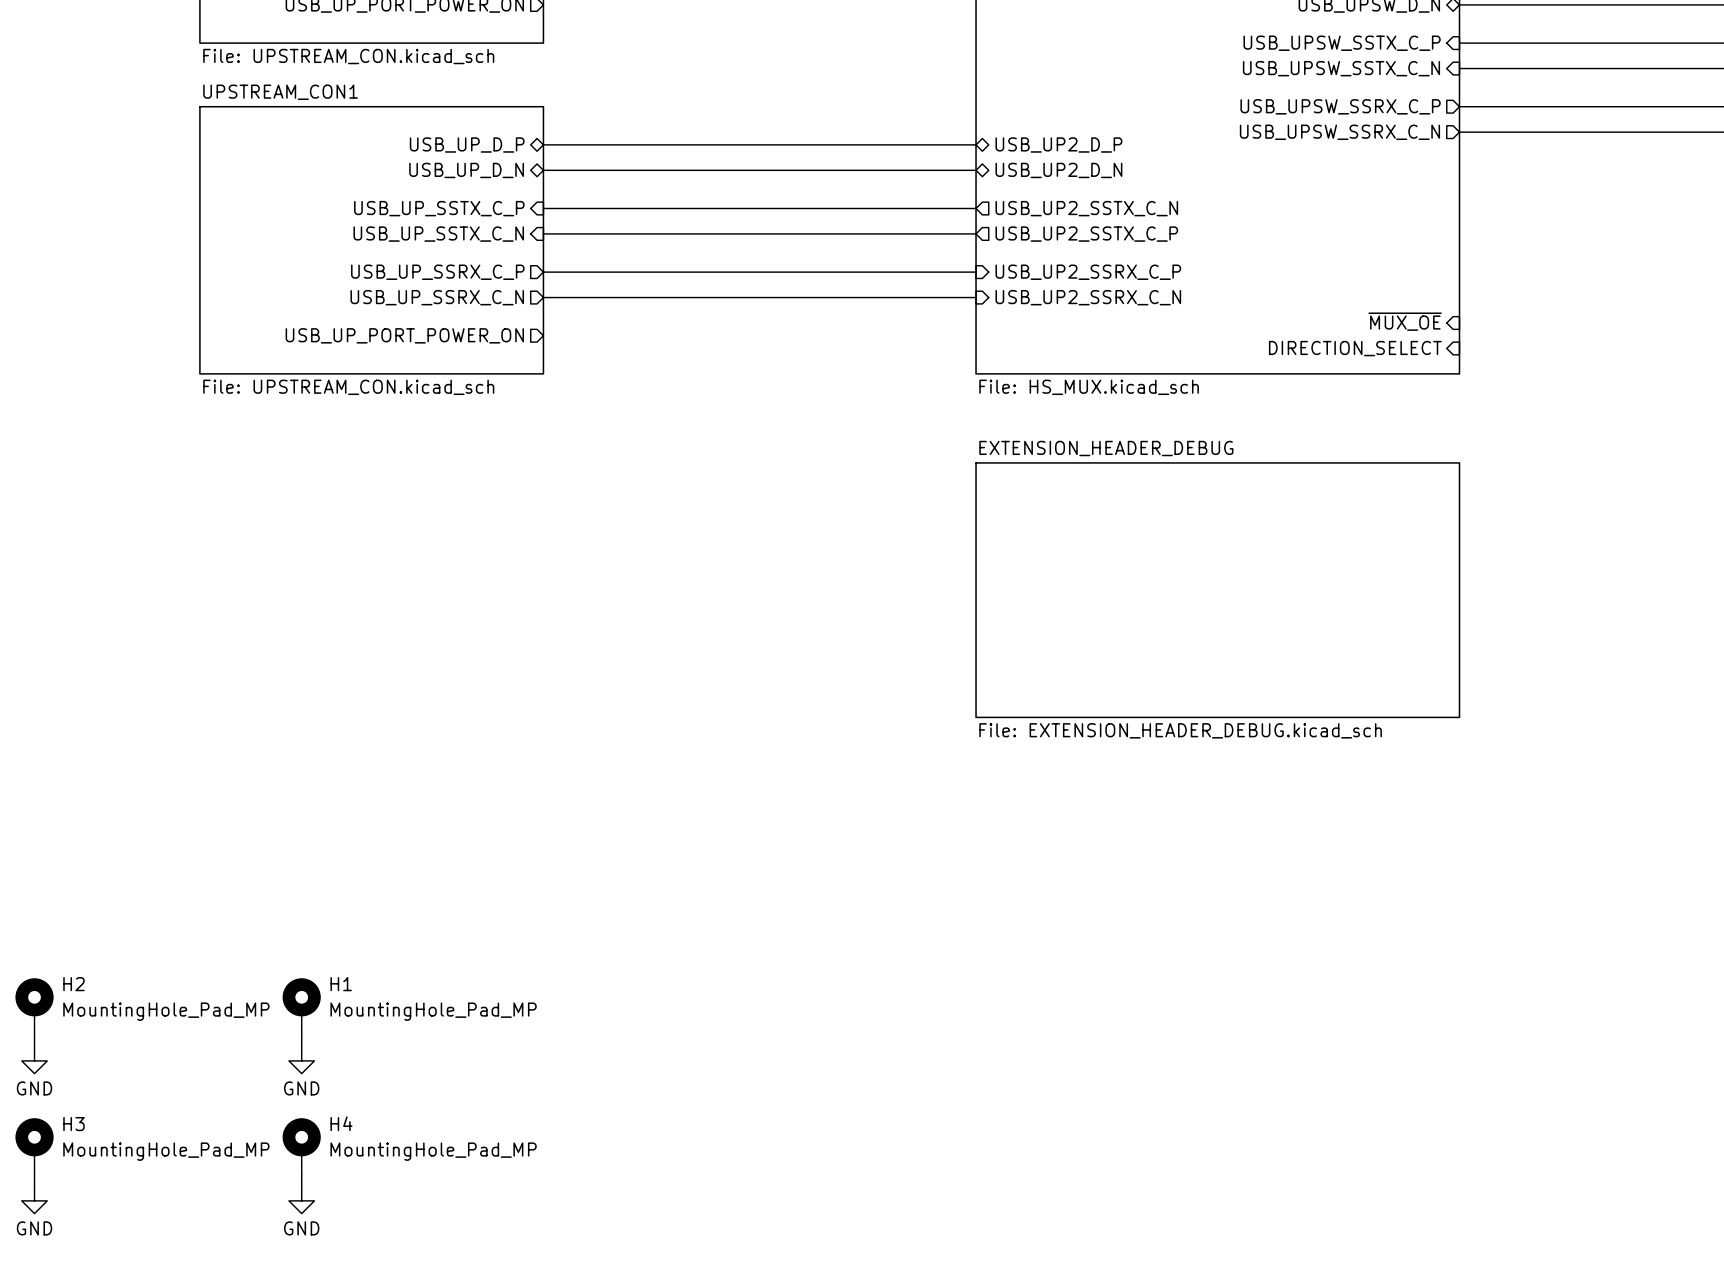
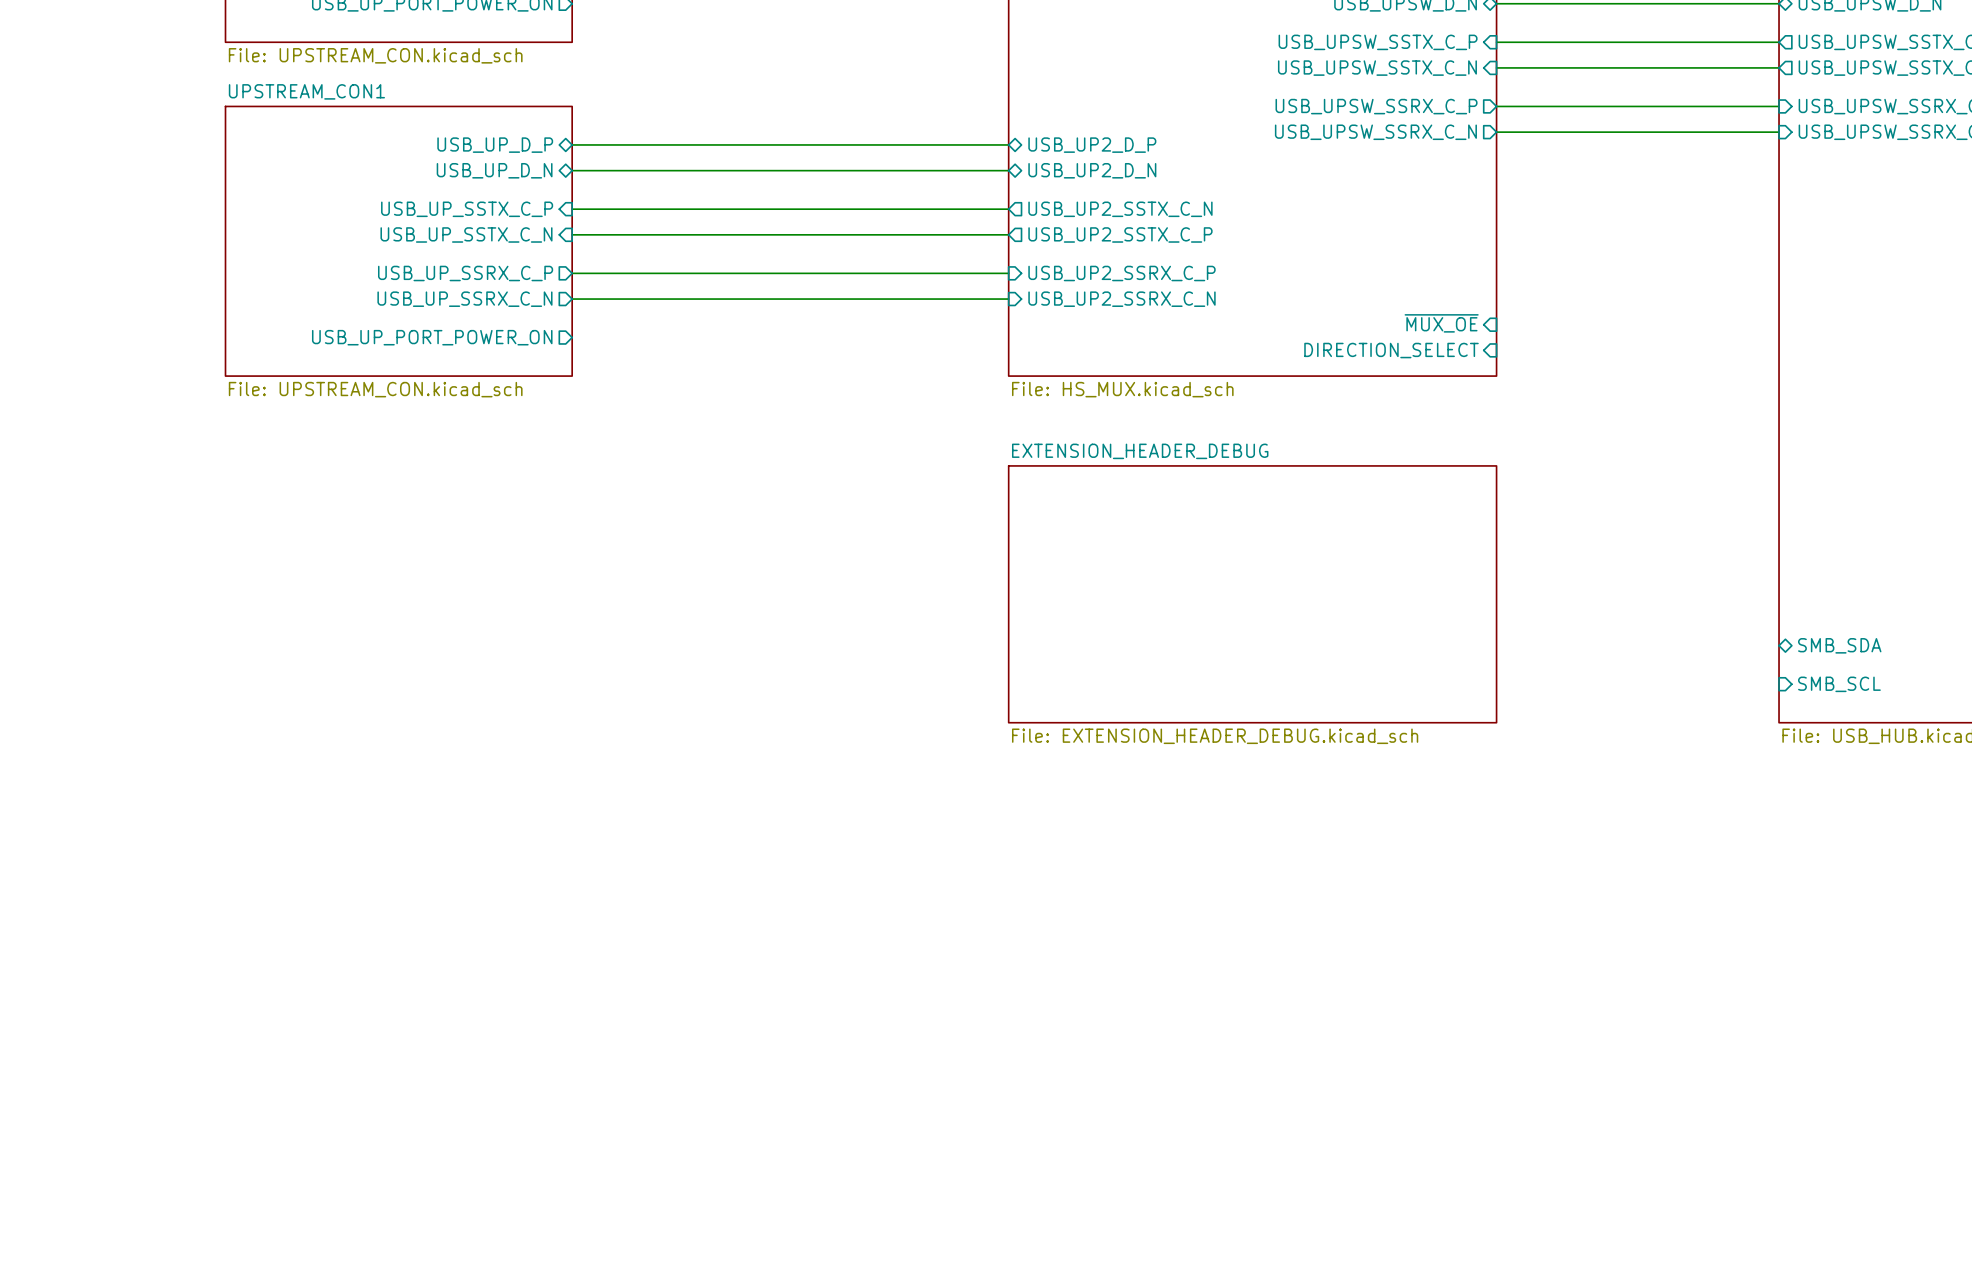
H2: MountingHole_Pad_MP (34, 1006) -> none
H1: MountingHole_Pad_MP (301, 1006) -> none
wire: (34, 1035) (34, 1048) -> none
wire: (301, 1035) (301, 1048) -> none
power symbol: GND (34, 1060) -> none
power symbol: GND (301, 1060) -> none
H3: MountingHole_Pad_MP (34, 1146) -> none
H4: MountingHole_Pad_MP (301, 1146) -> none
wire: (34, 1175) (34, 1188) -> none
wire: (301, 1175) (301, 1188) -> none
power symbol: GND (34, 1200) -> none
power symbol: GND (301, 1200) -> none

